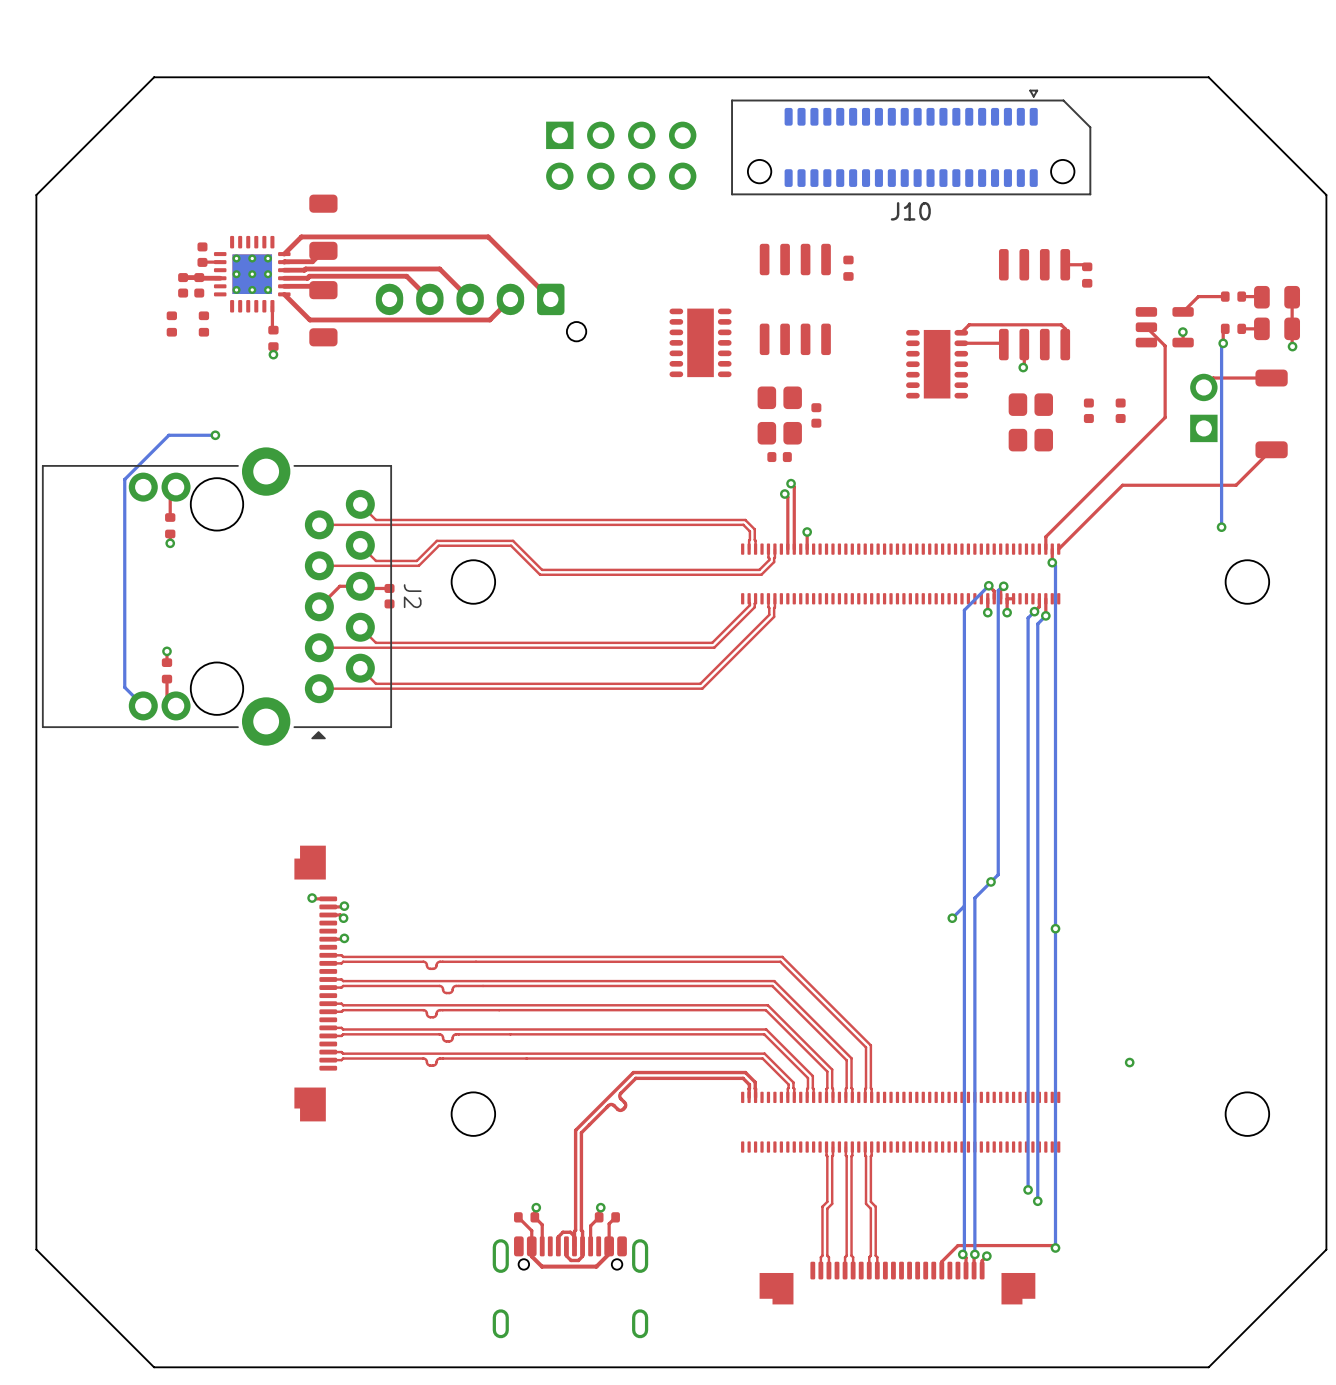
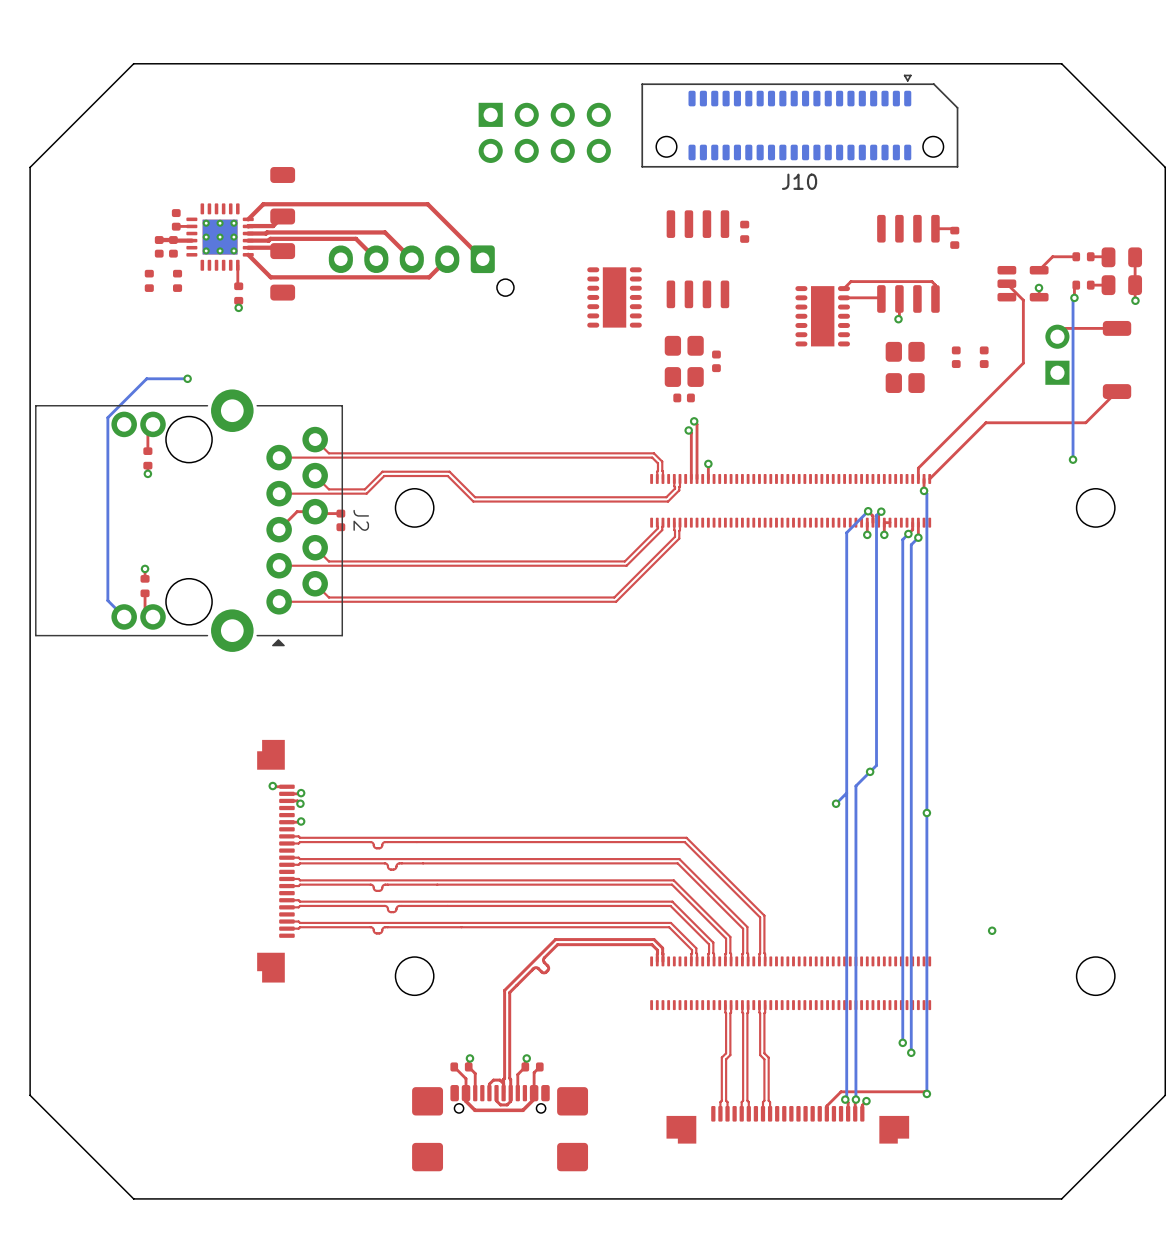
part footprint: [492, 1236, 649, 1339] -> [412, 1084, 589, 1172]

